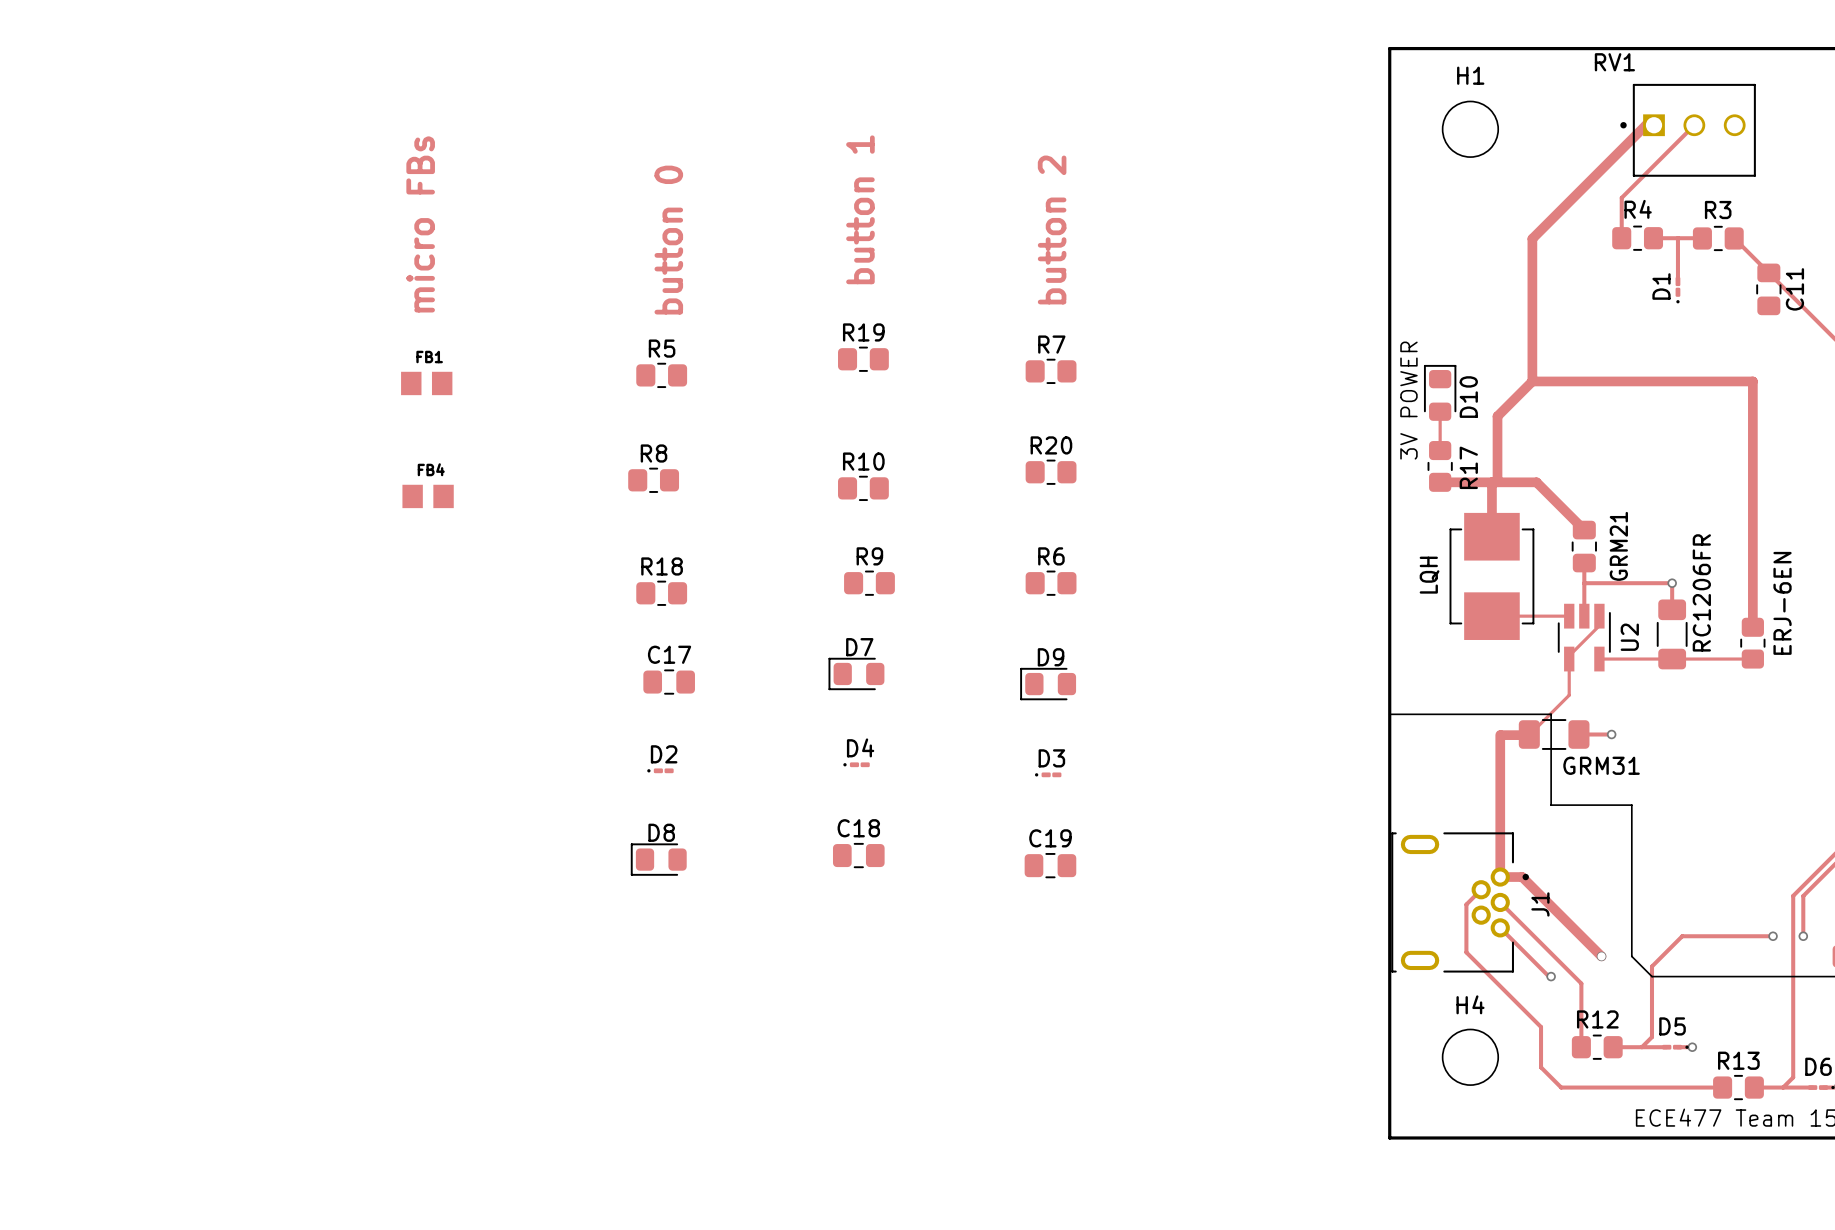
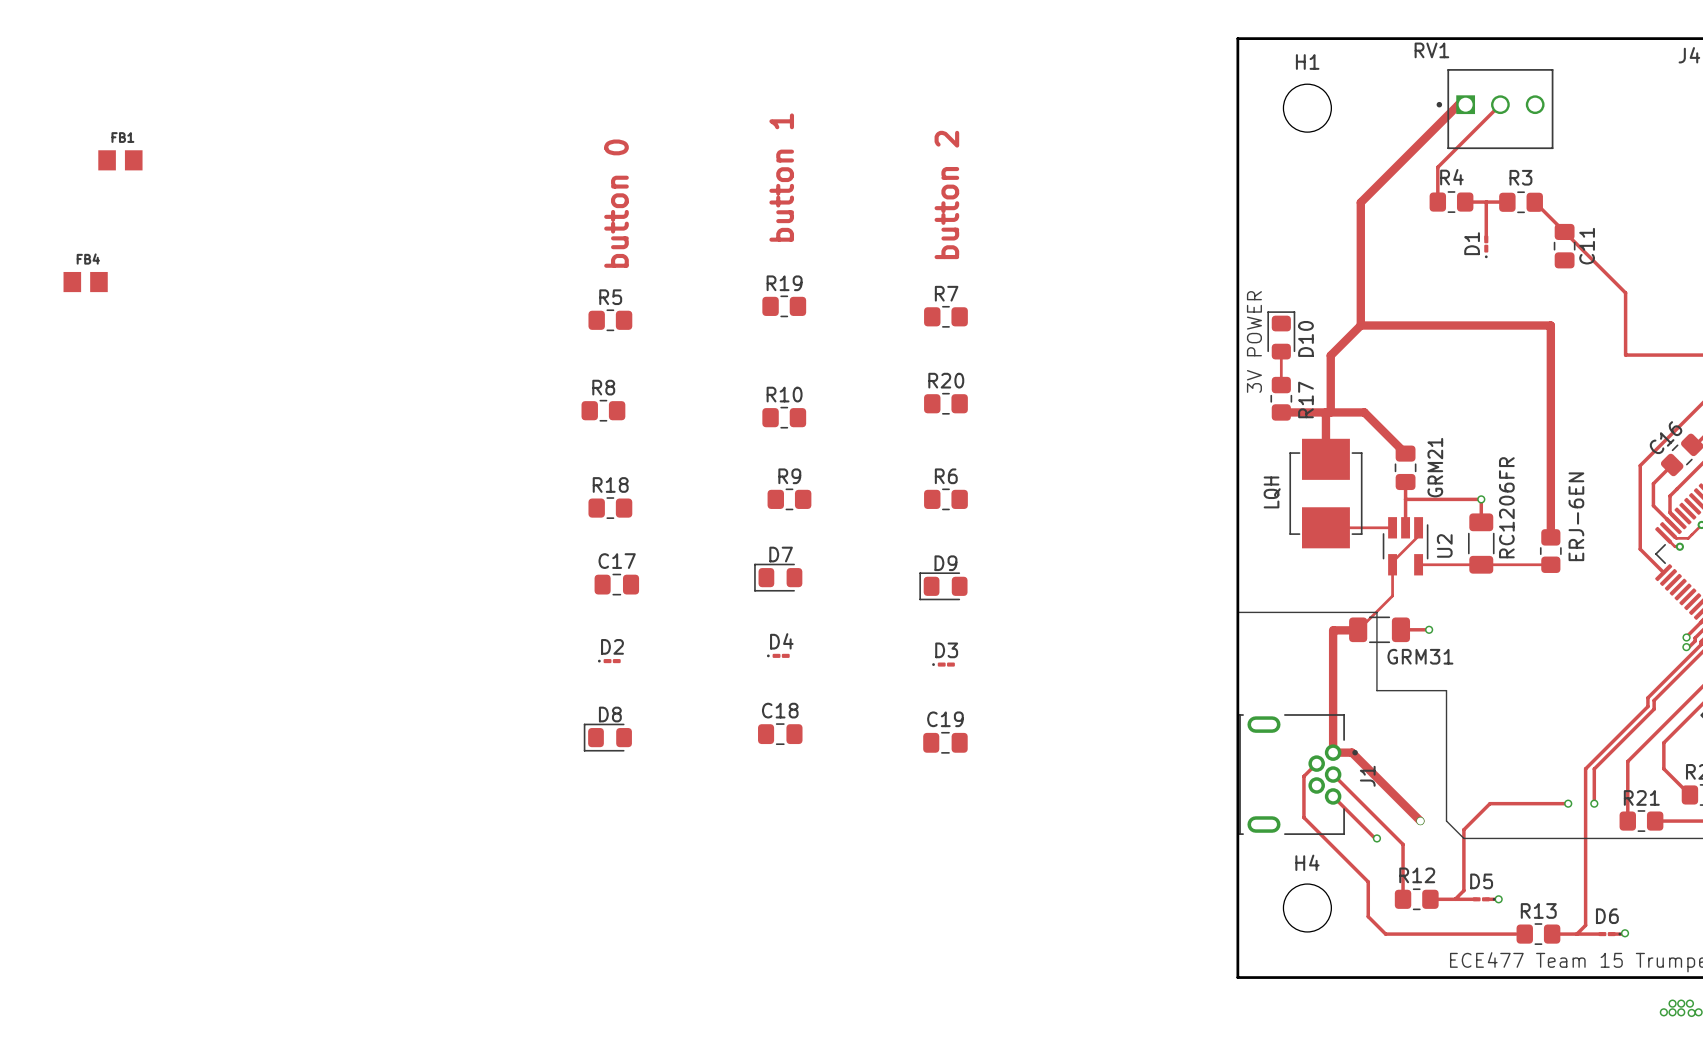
text: micro FBs (420, 224) -> none
FB1 position: (426, 383) -> (120, 160)
FB4 position: (428, 496) -> (85, 282)

